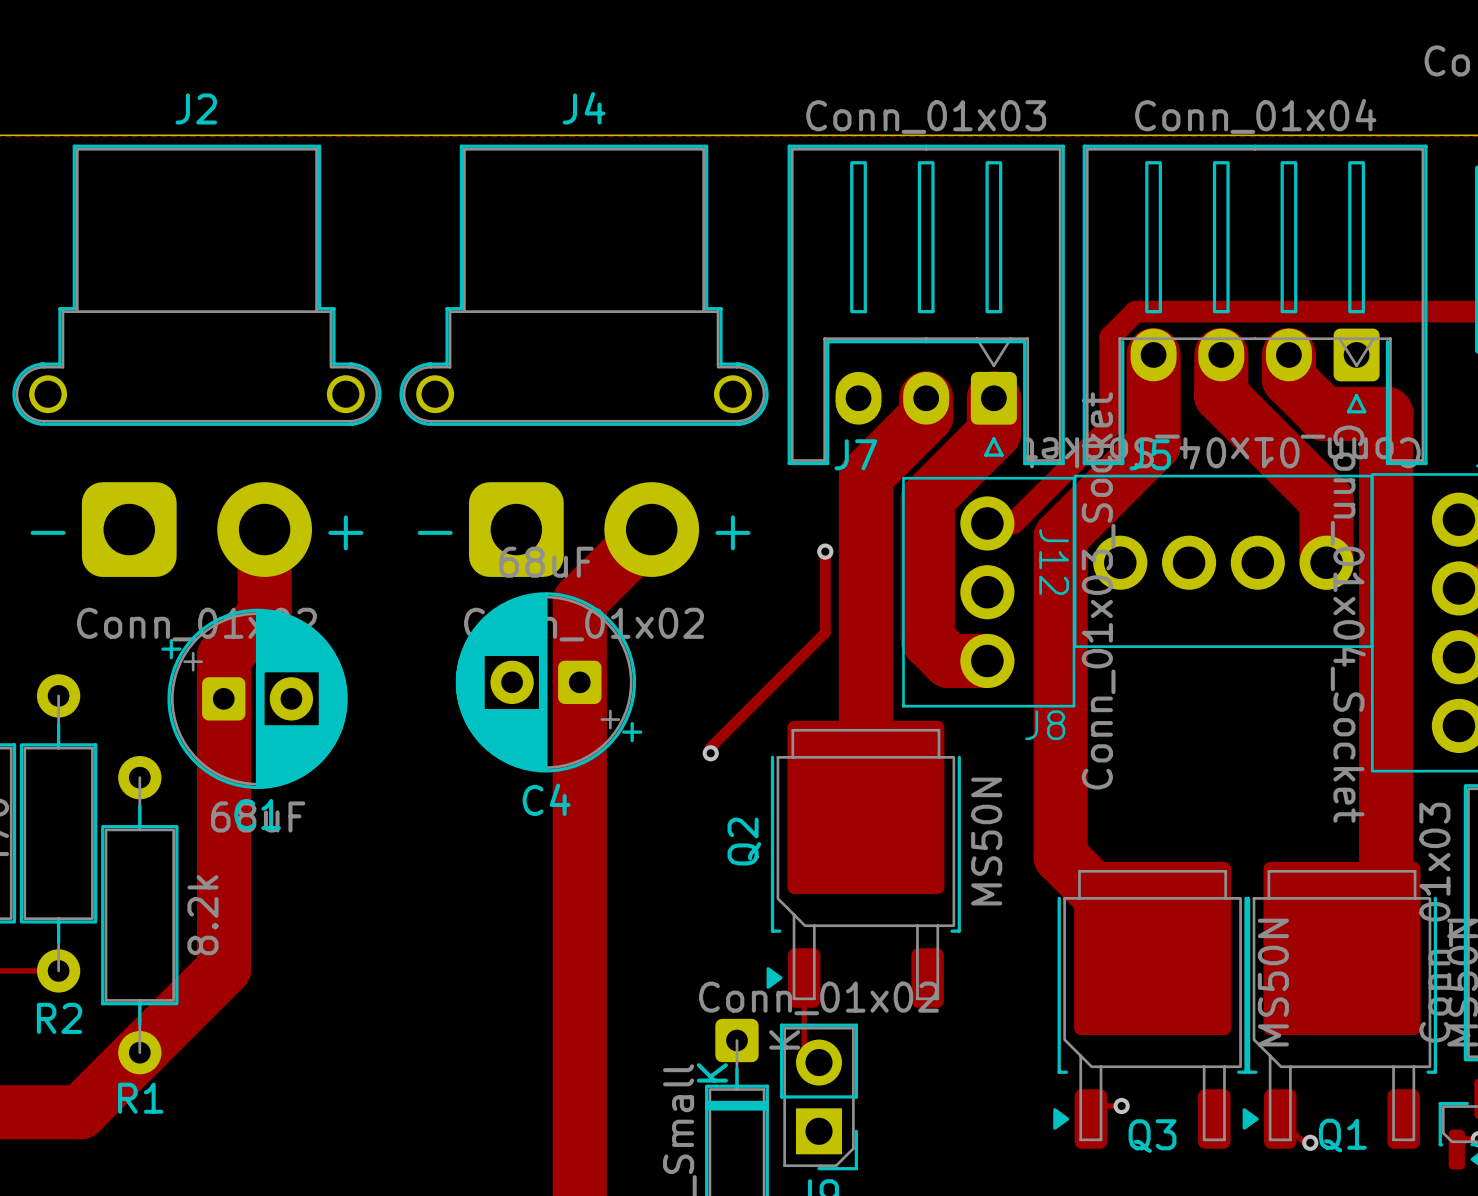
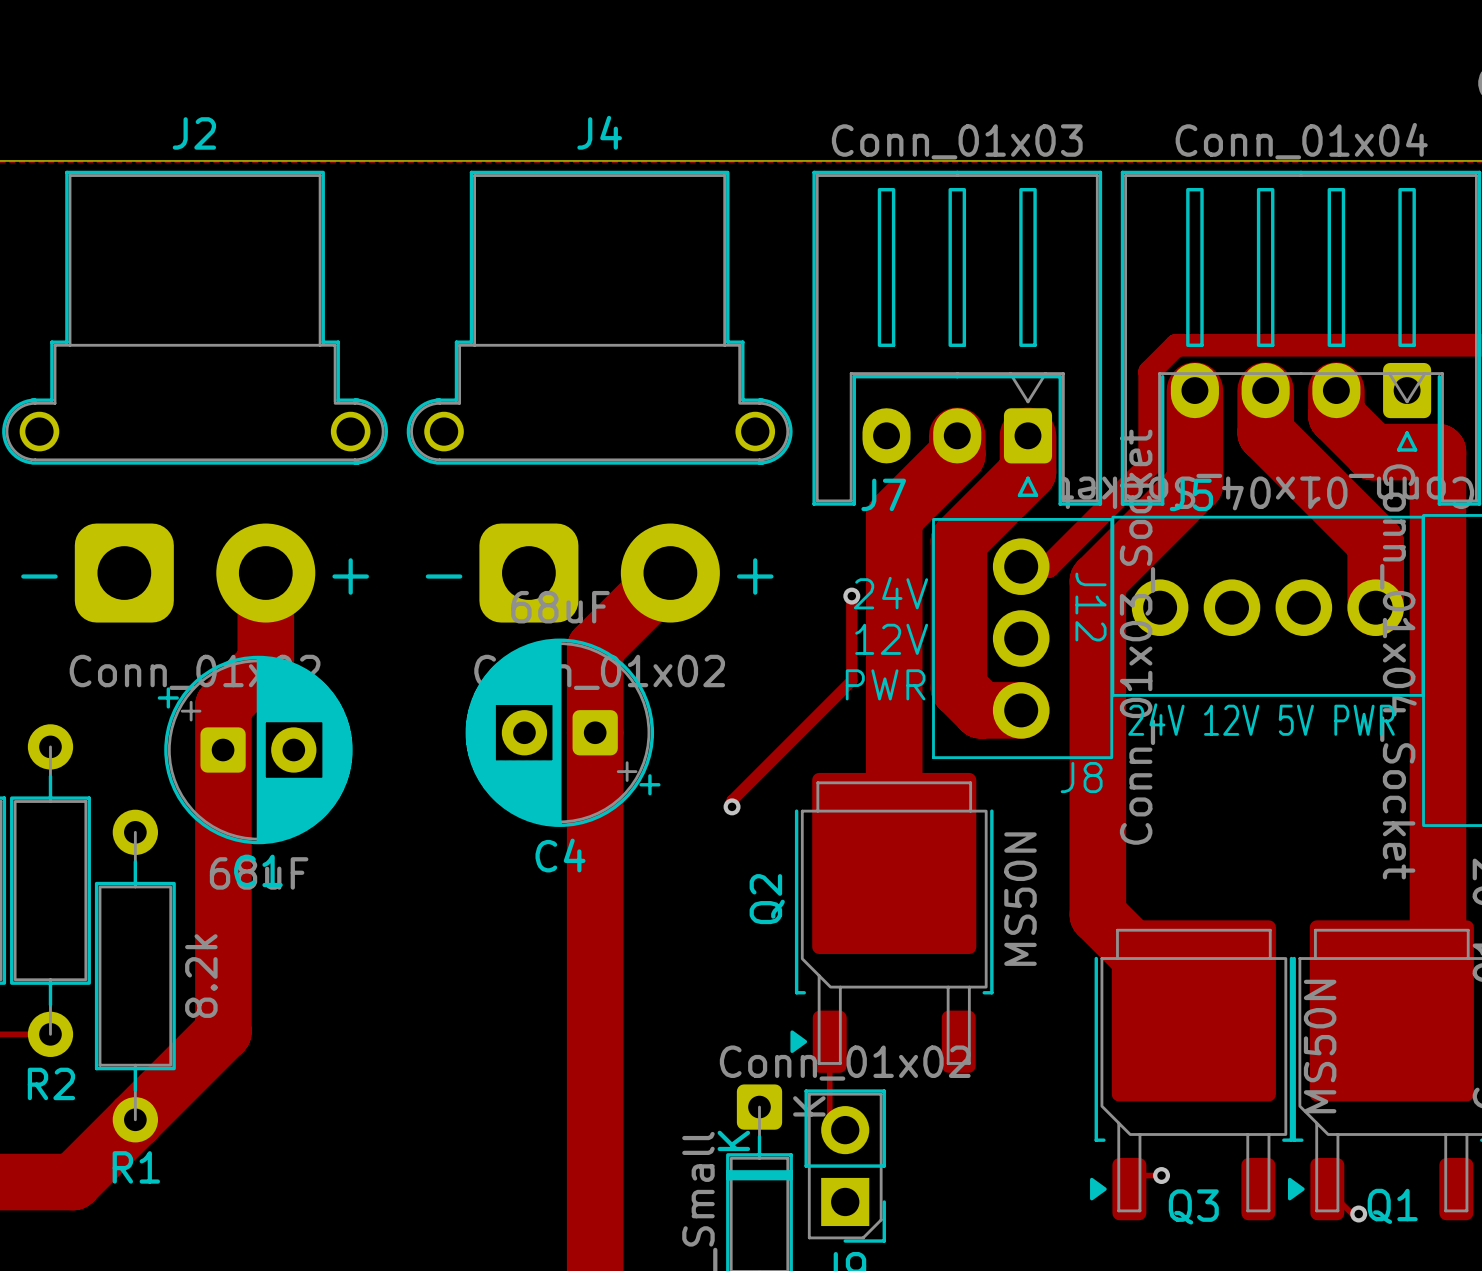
text: none -> 24V (890, 593)
text: none -> 12V (891, 639)
text: none -> PWR (885, 684)
text: none -> 24V 12V 5V PWR (1261, 719)

